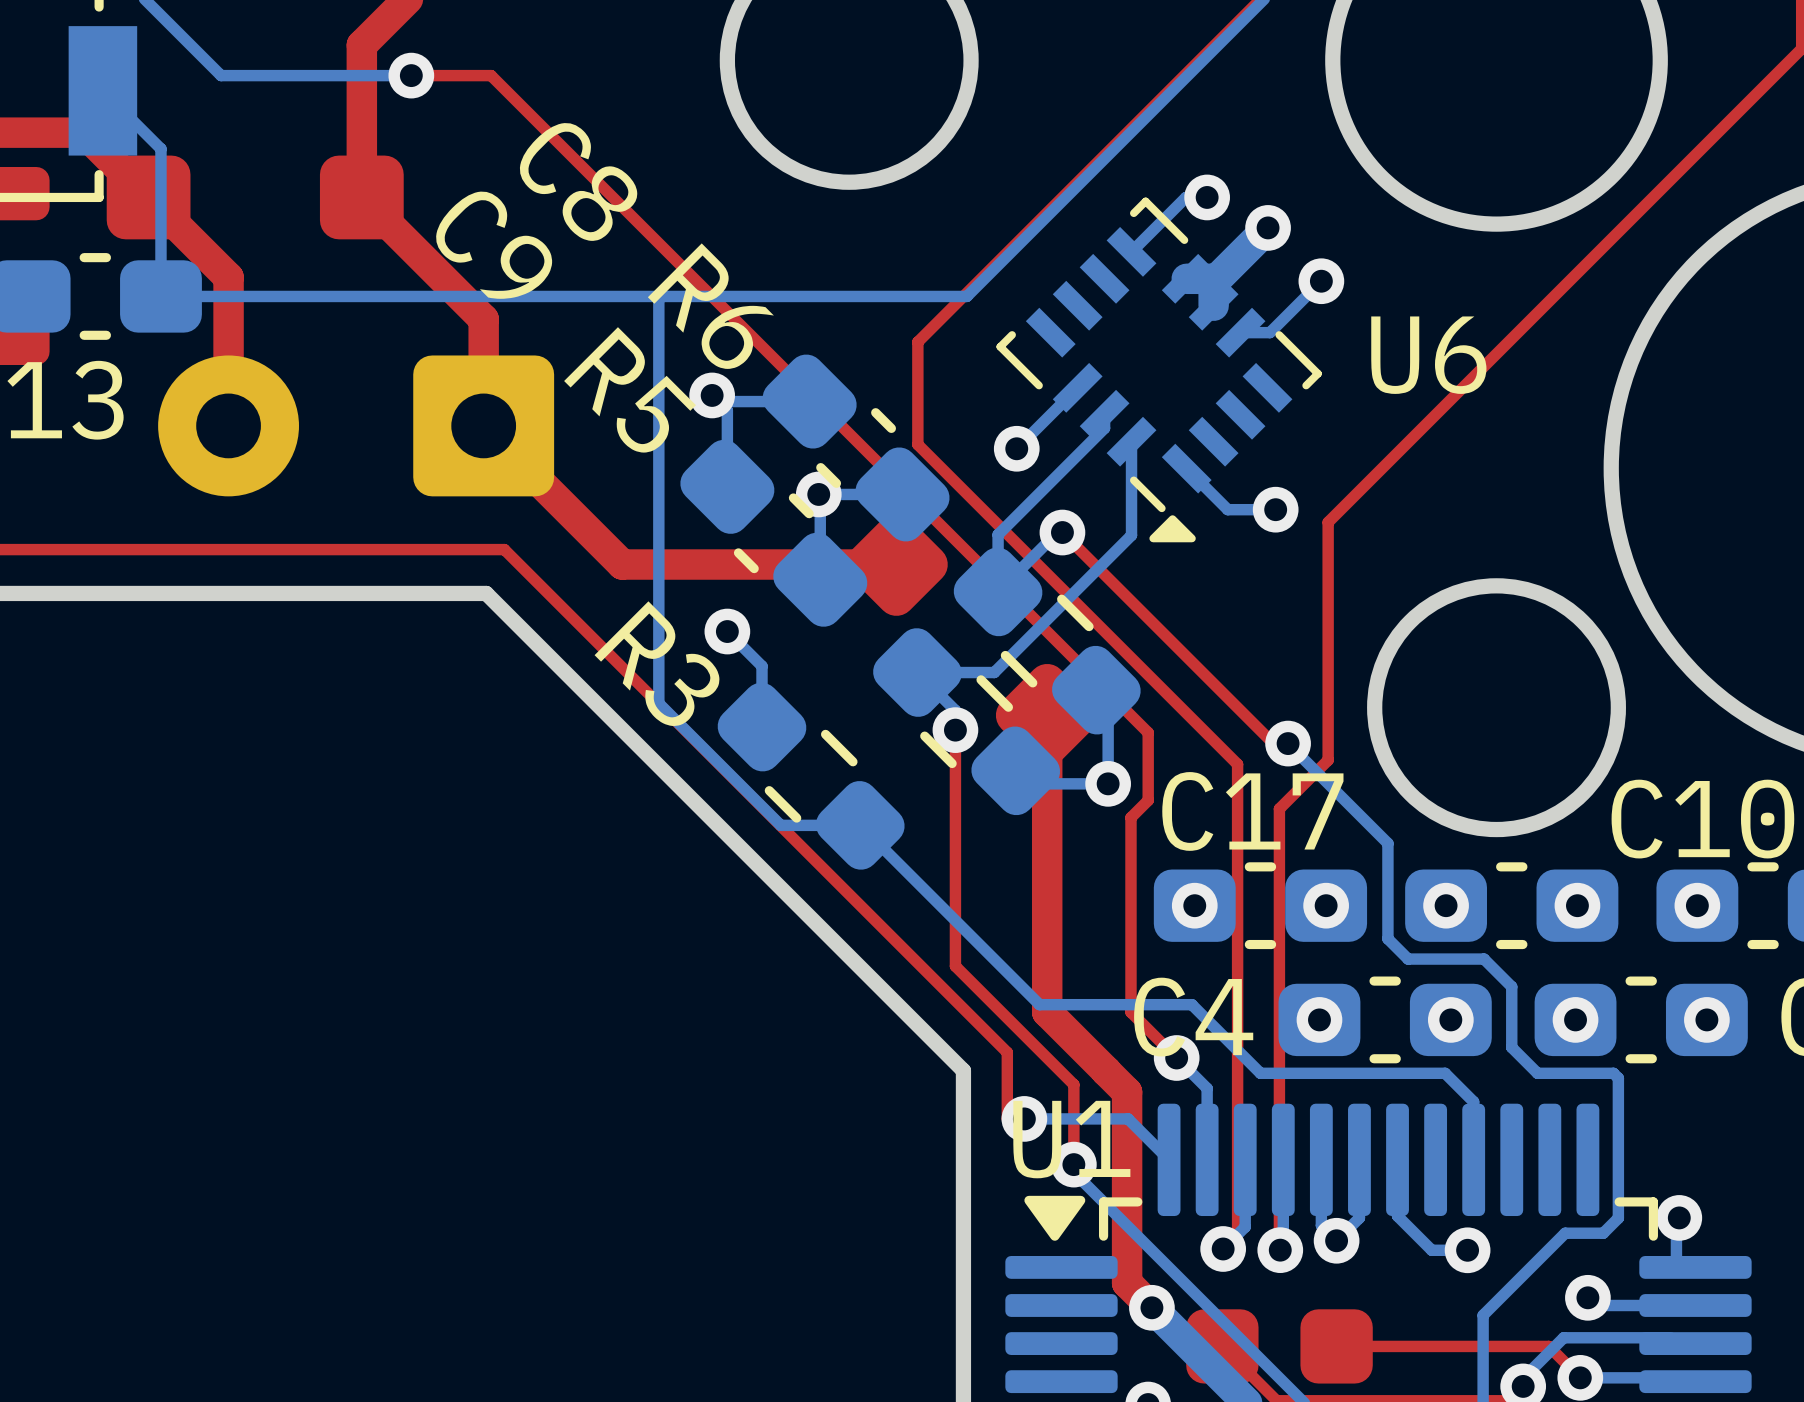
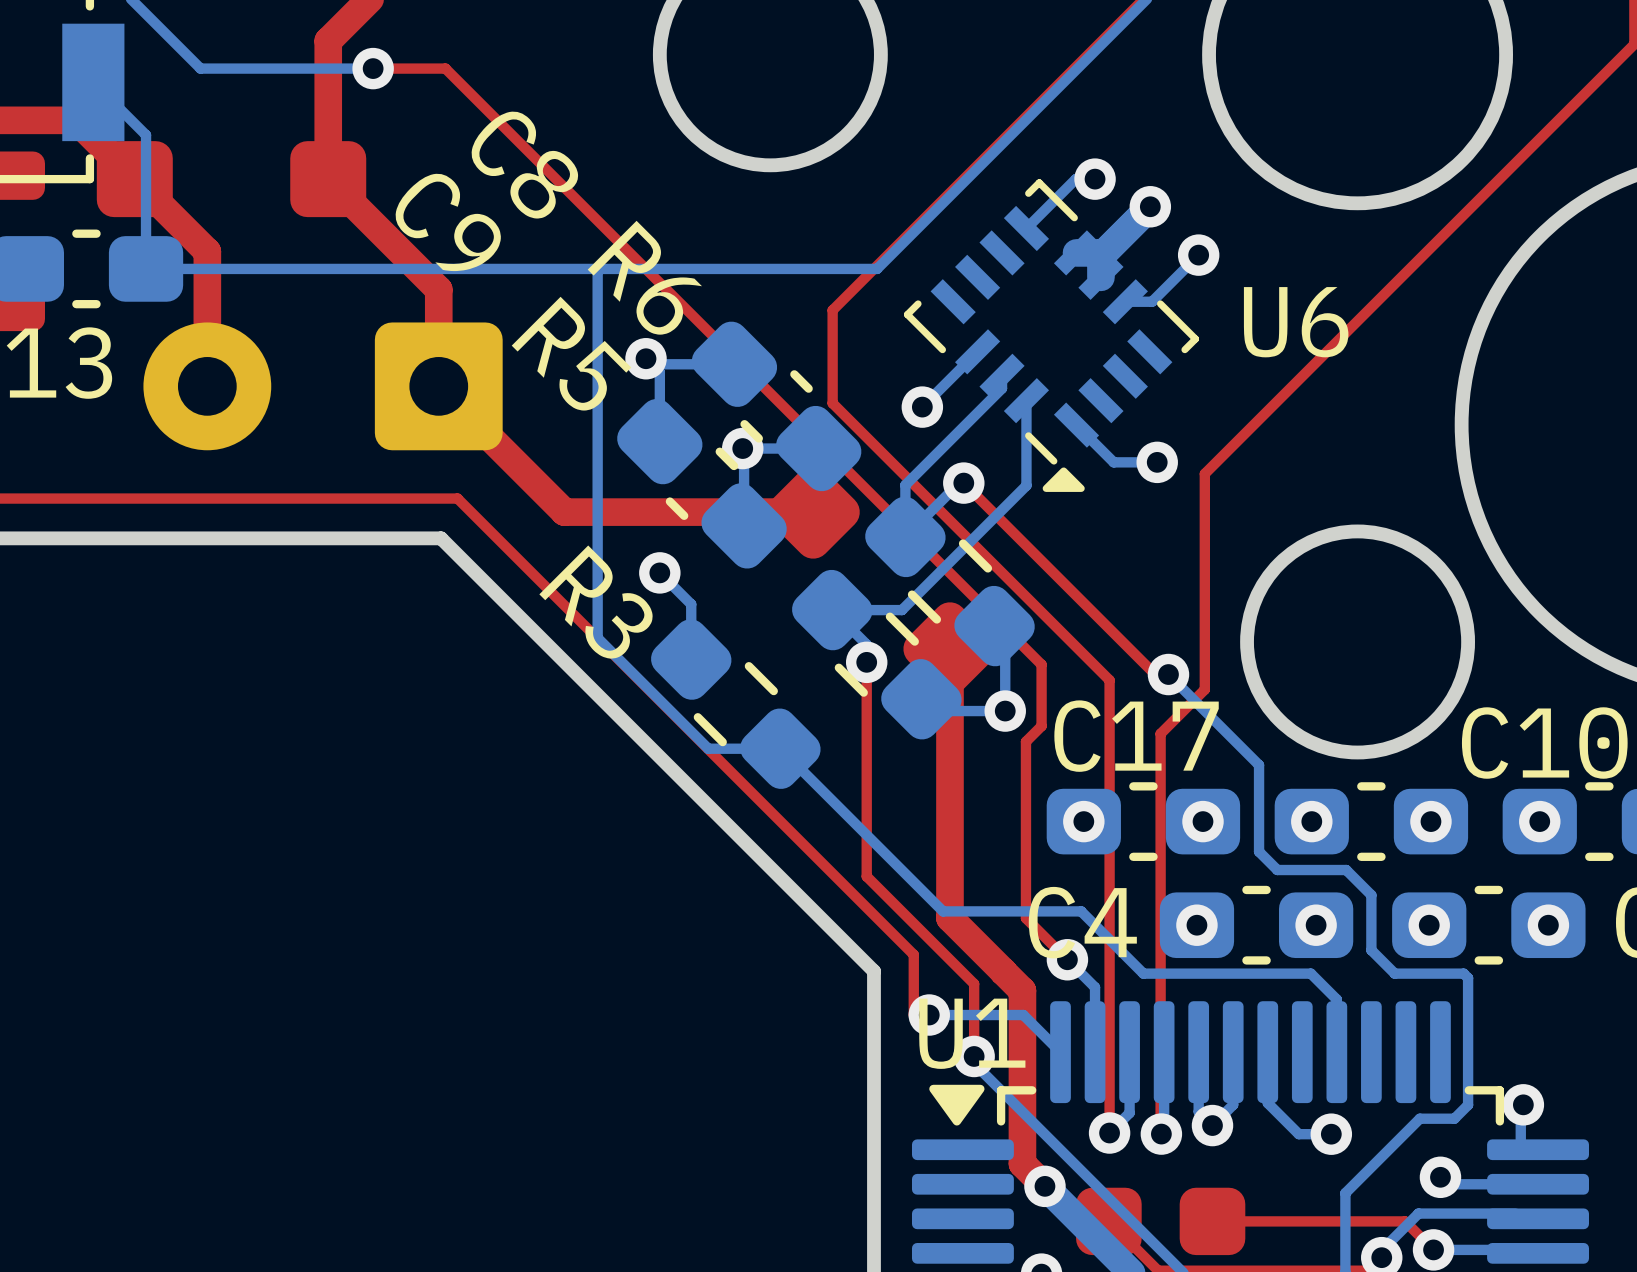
top track: (1223, 749) (1237, 764) (1237, 1234) (1223, 1248) -> (1109, 680) (1109, 1133)

